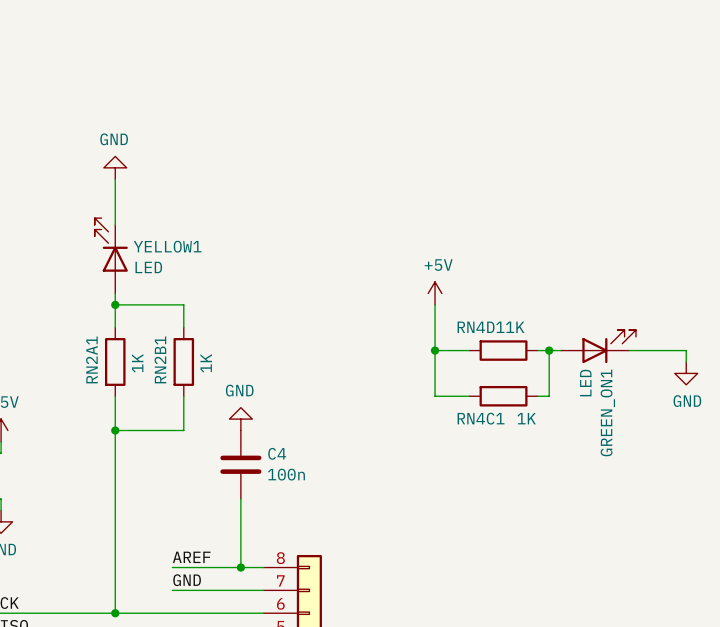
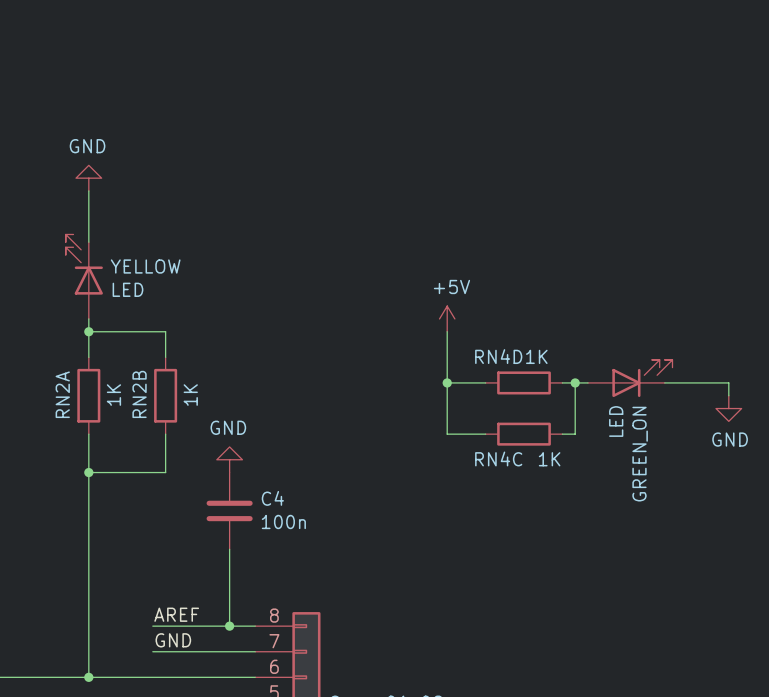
YELLOW1 name: YELLOW1 (167, 246) -> YELLOW (145, 266)
RN4D1 name: RN4D1 (481, 327) -> RN4D (498, 356)
RN2A1 name: RN2A1 (91, 359) -> RN2A (62, 394)
RN2B1 name: RN2B1 (160, 359) -> RN2B (139, 394)
GREEN_ON1 name: GREEN_ON1 (607, 412) -> GREEN_ON (640, 454)
RN4C1 name: RN4C1 (481, 418) -> RN4C (498, 458)

